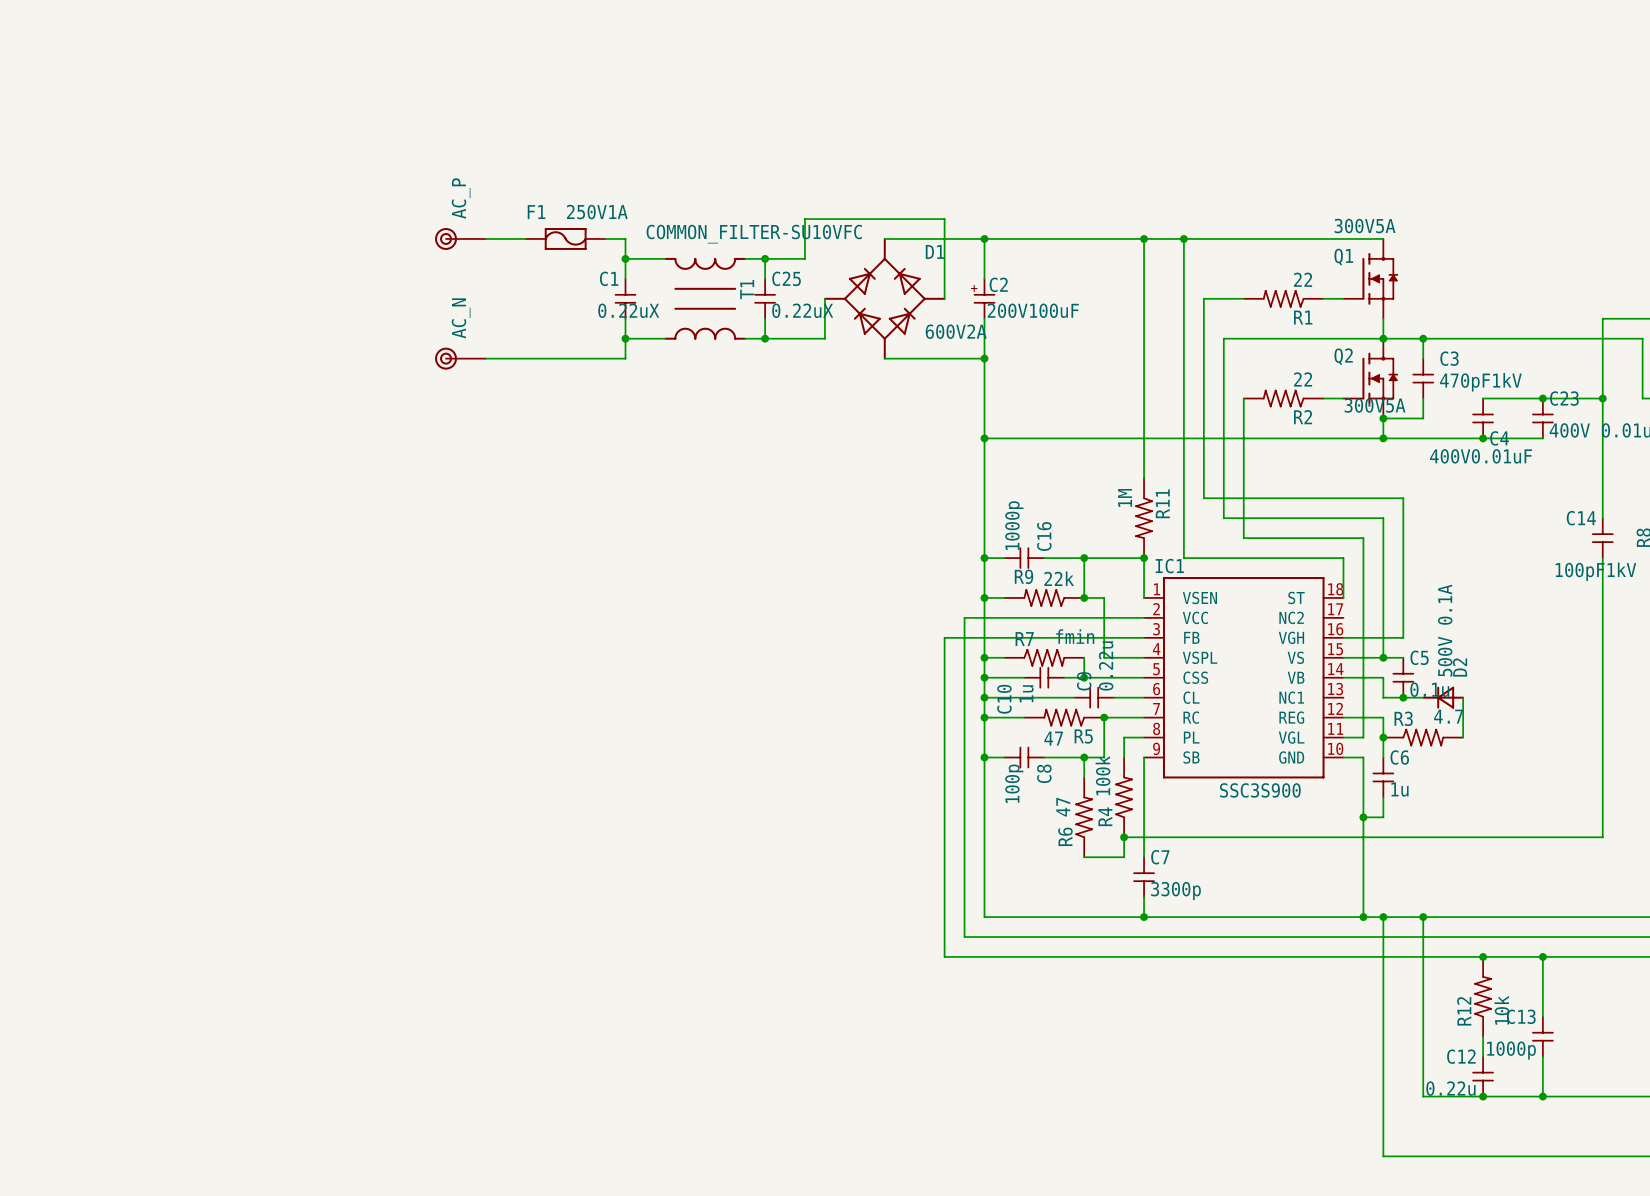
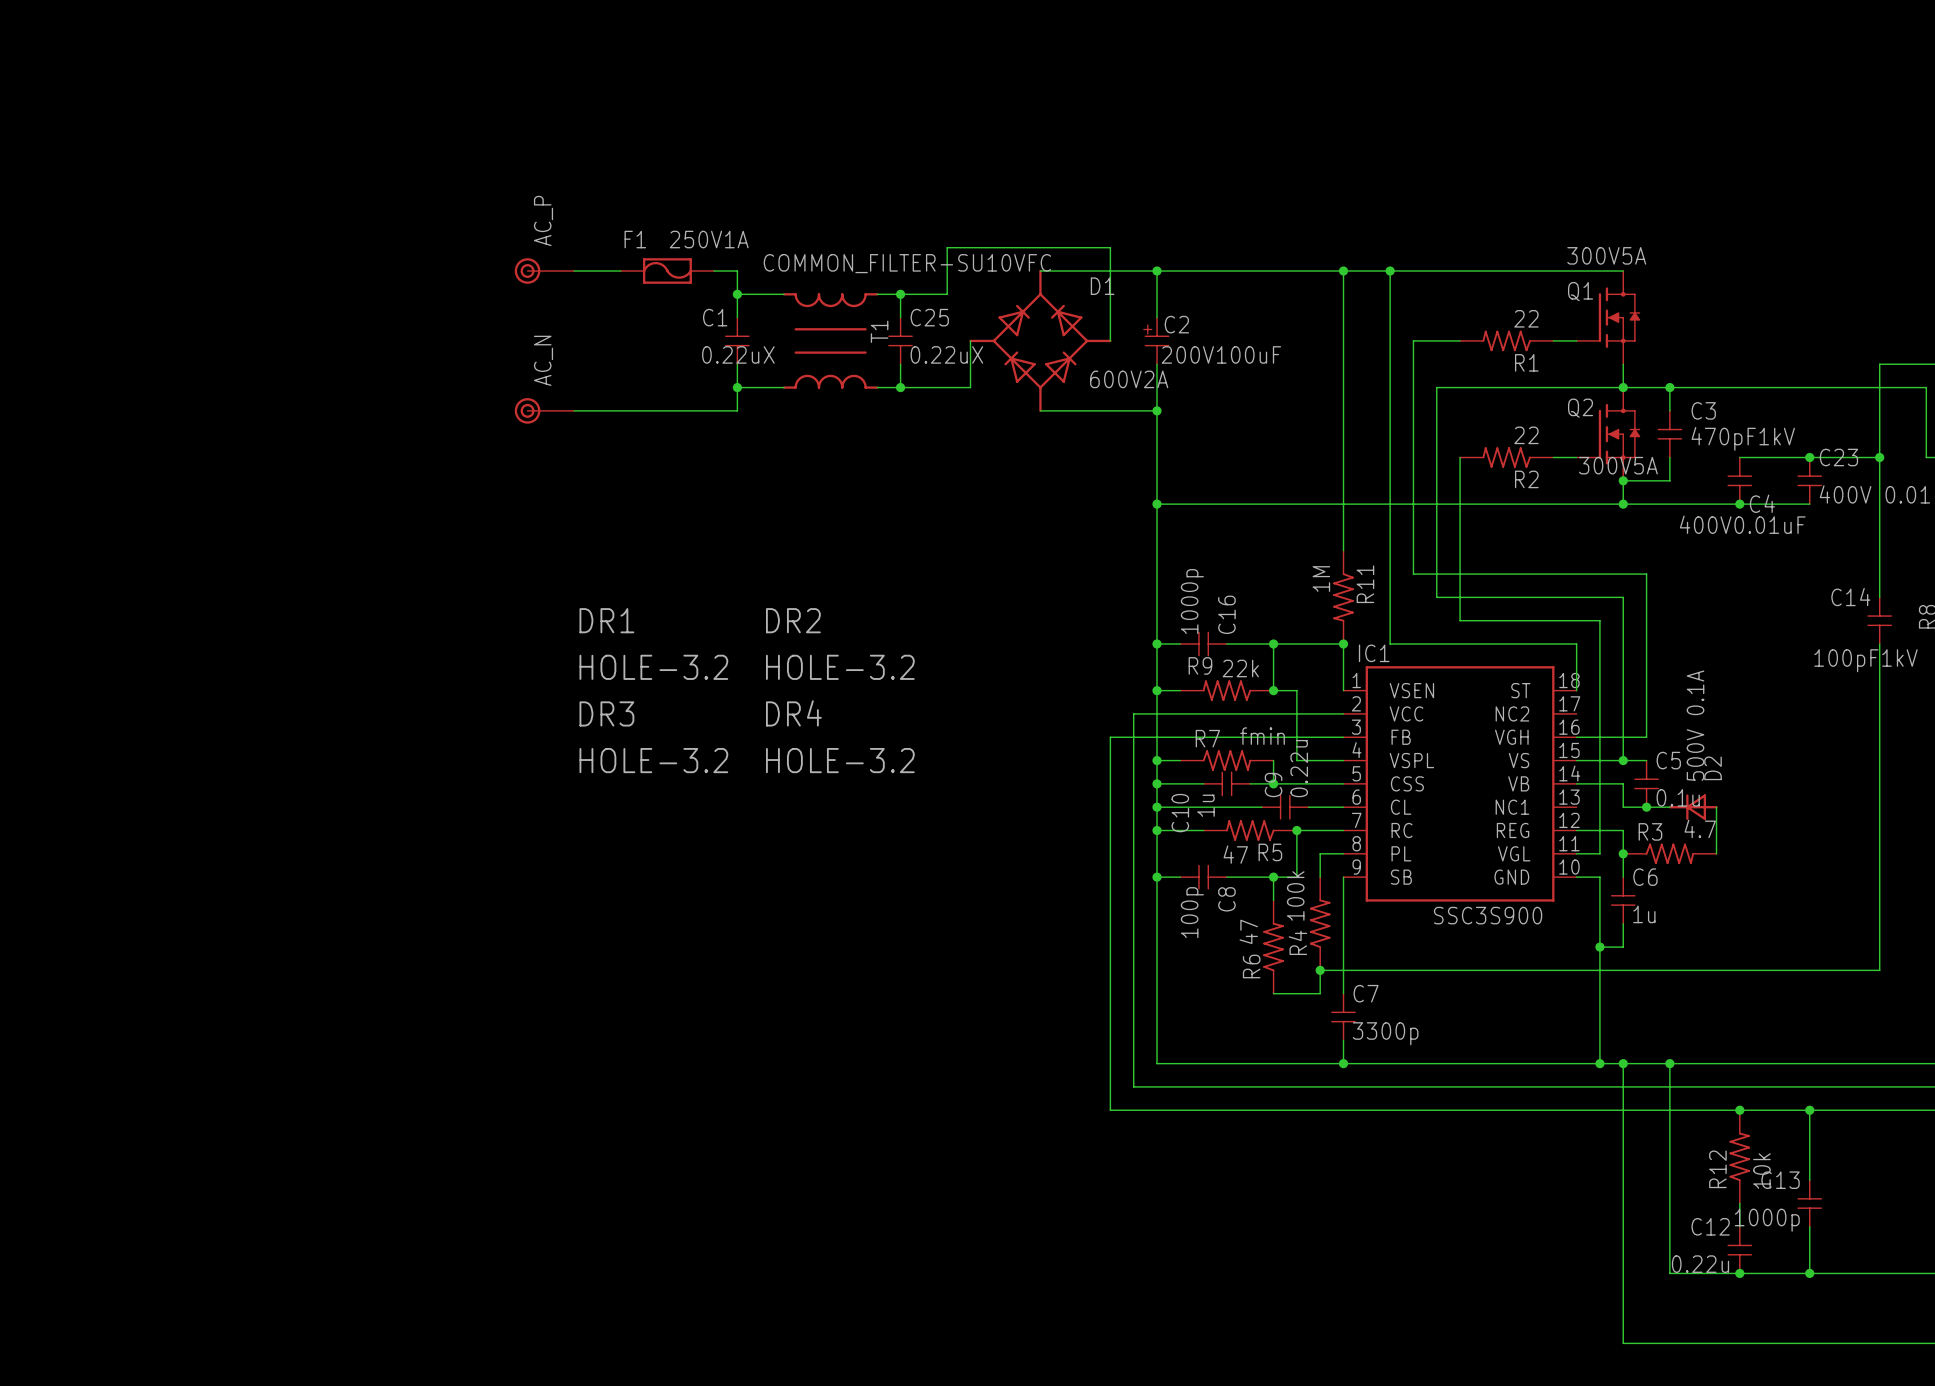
DR1: none -> HOLE-3.2 (653, 644)
DR2: none -> HOLE-3.2 (840, 644)
DR3: none -> HOLE-3.2 (653, 737)
DR4: none -> HOLE-3.2 (840, 736)

